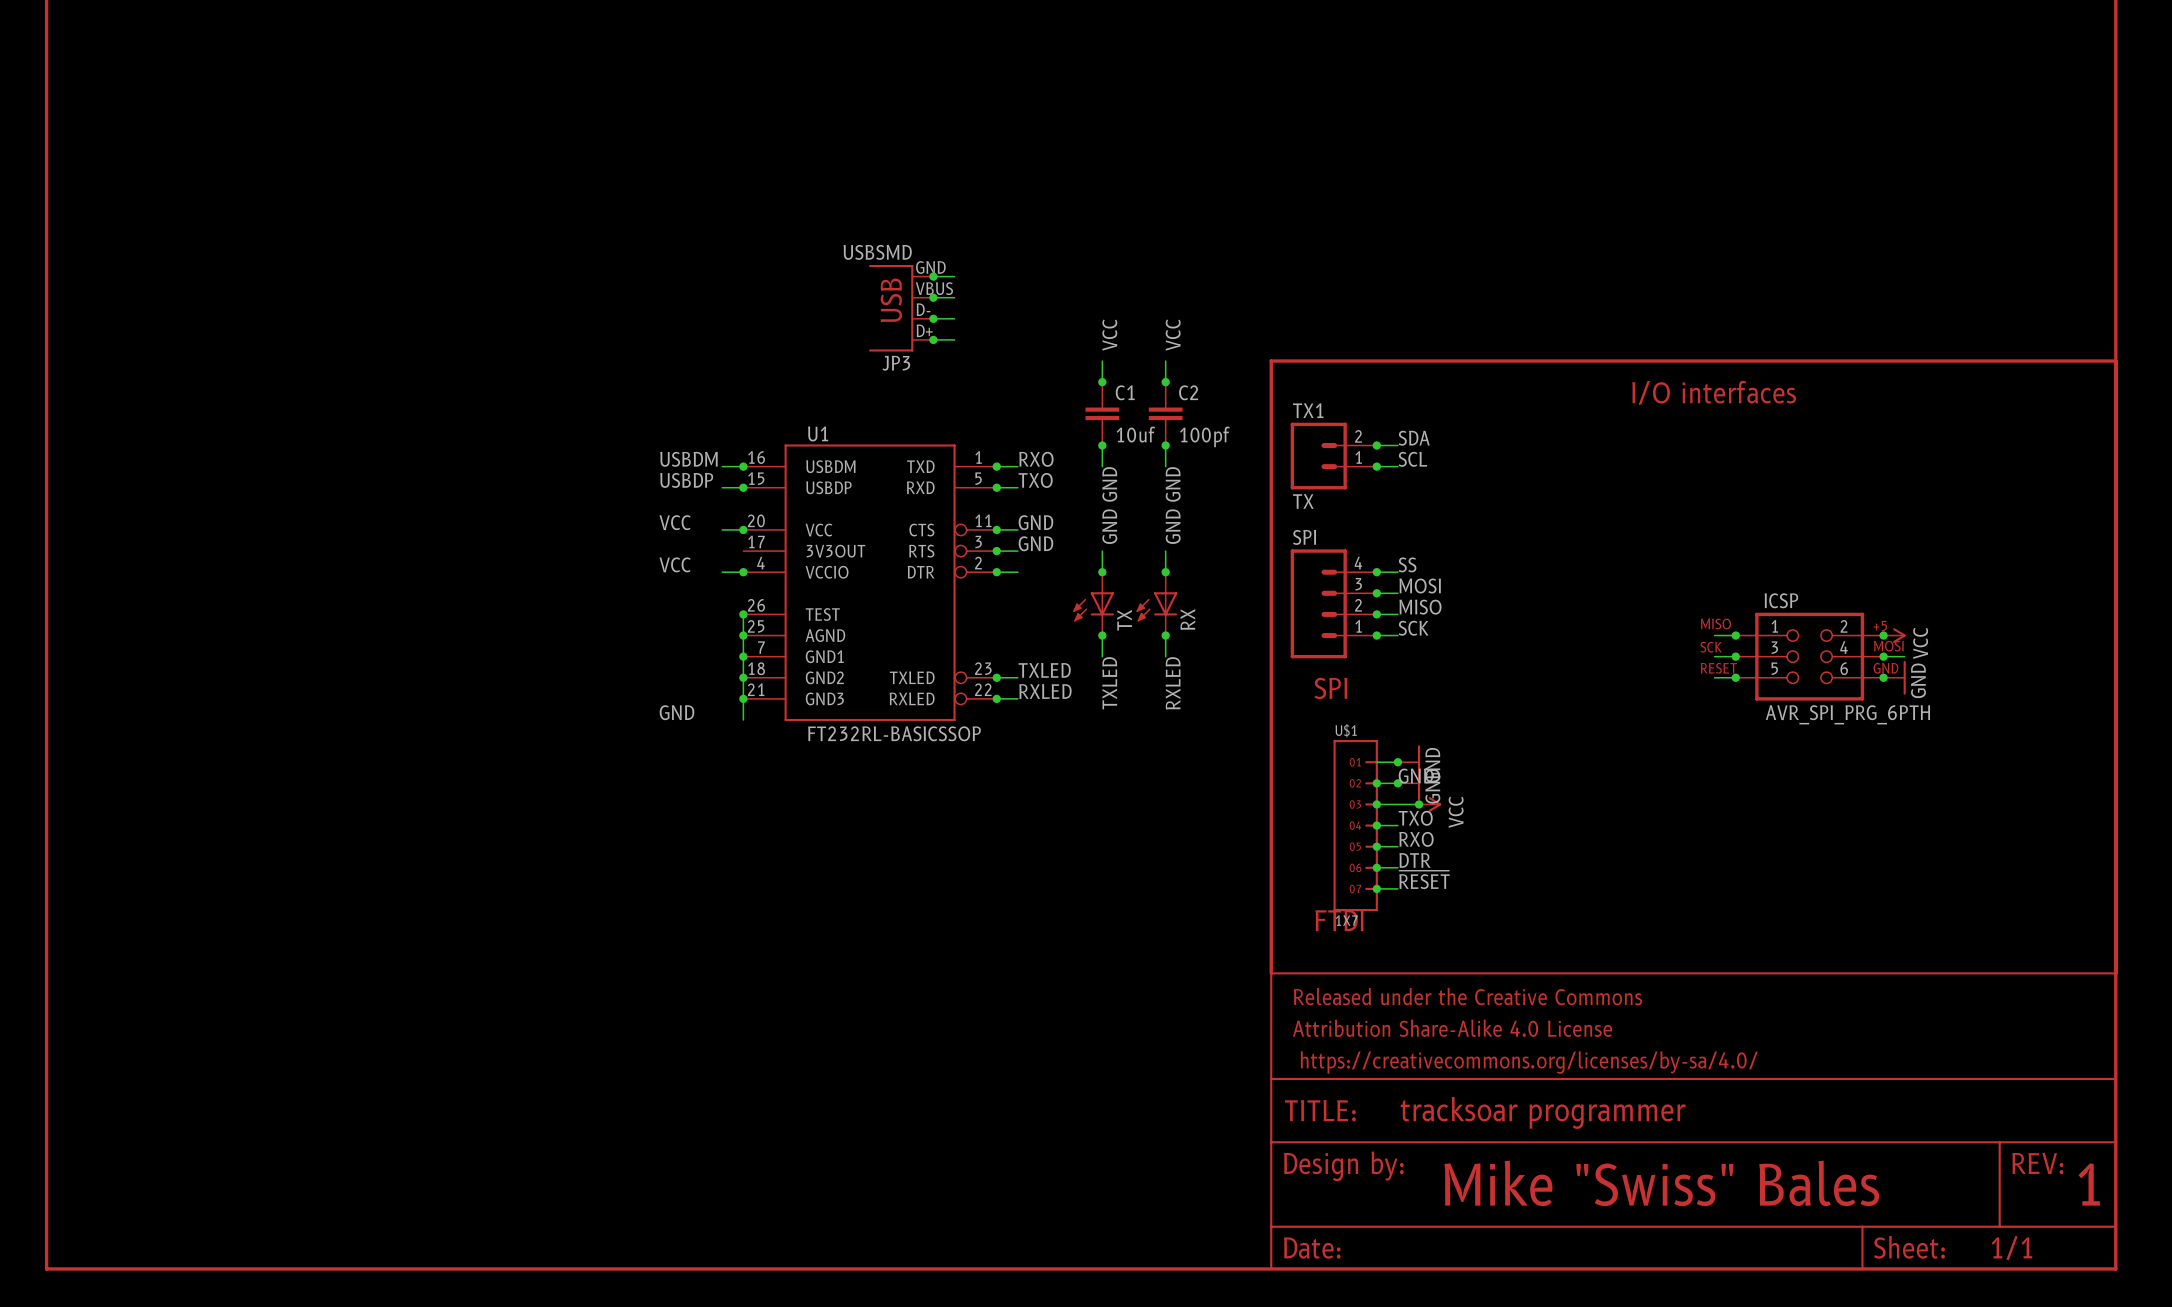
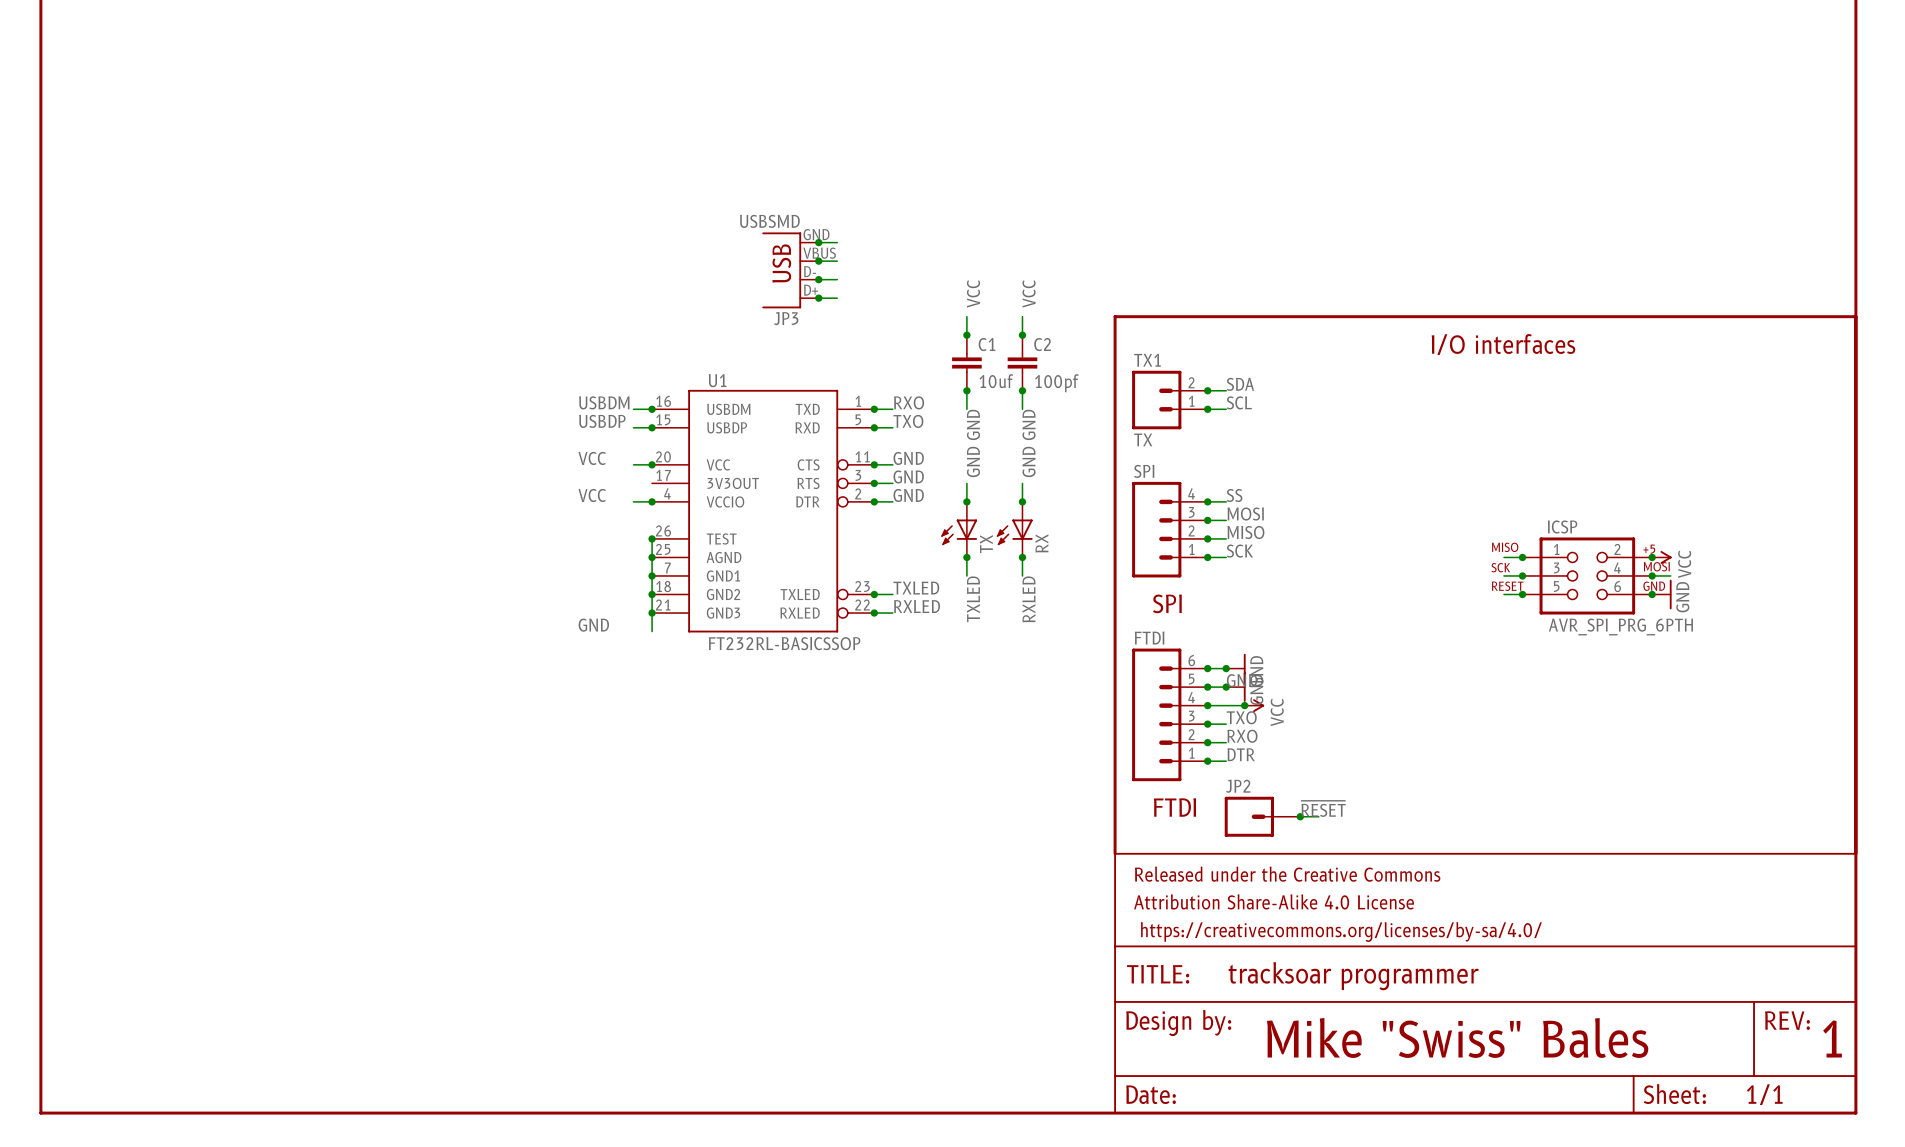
label: none -> GND (908, 495)
junction: none -> (1207, 668)
FTDI: none -> (1169, 714)
U$1: 1X7 (1355, 825) -> none
label position: ~{RESET} (1424, 879) -> ~{RESET} (1323, 808)
wire: (1376, 888) (1397, 888) -> (1300, 816) (1318, 816)
junction: (1376, 888) -> none
JP2: none -> (1262, 816)
junction: none -> (1300, 816)

